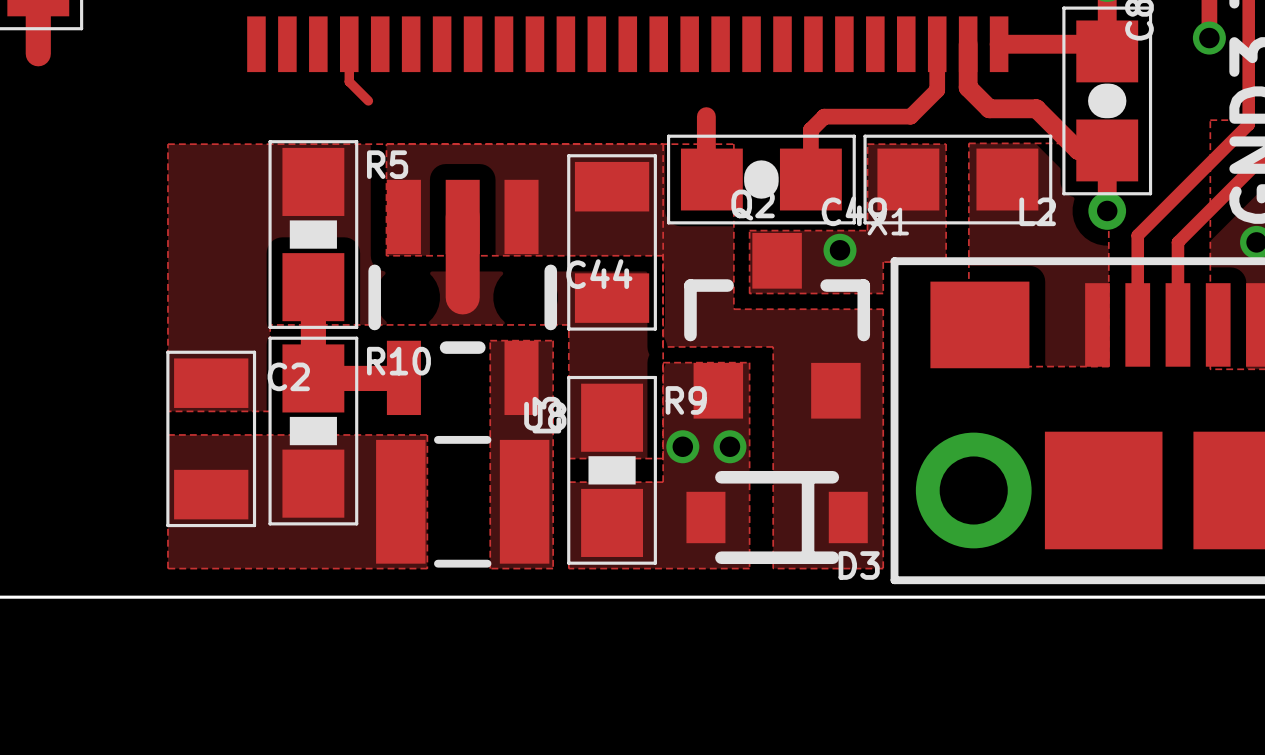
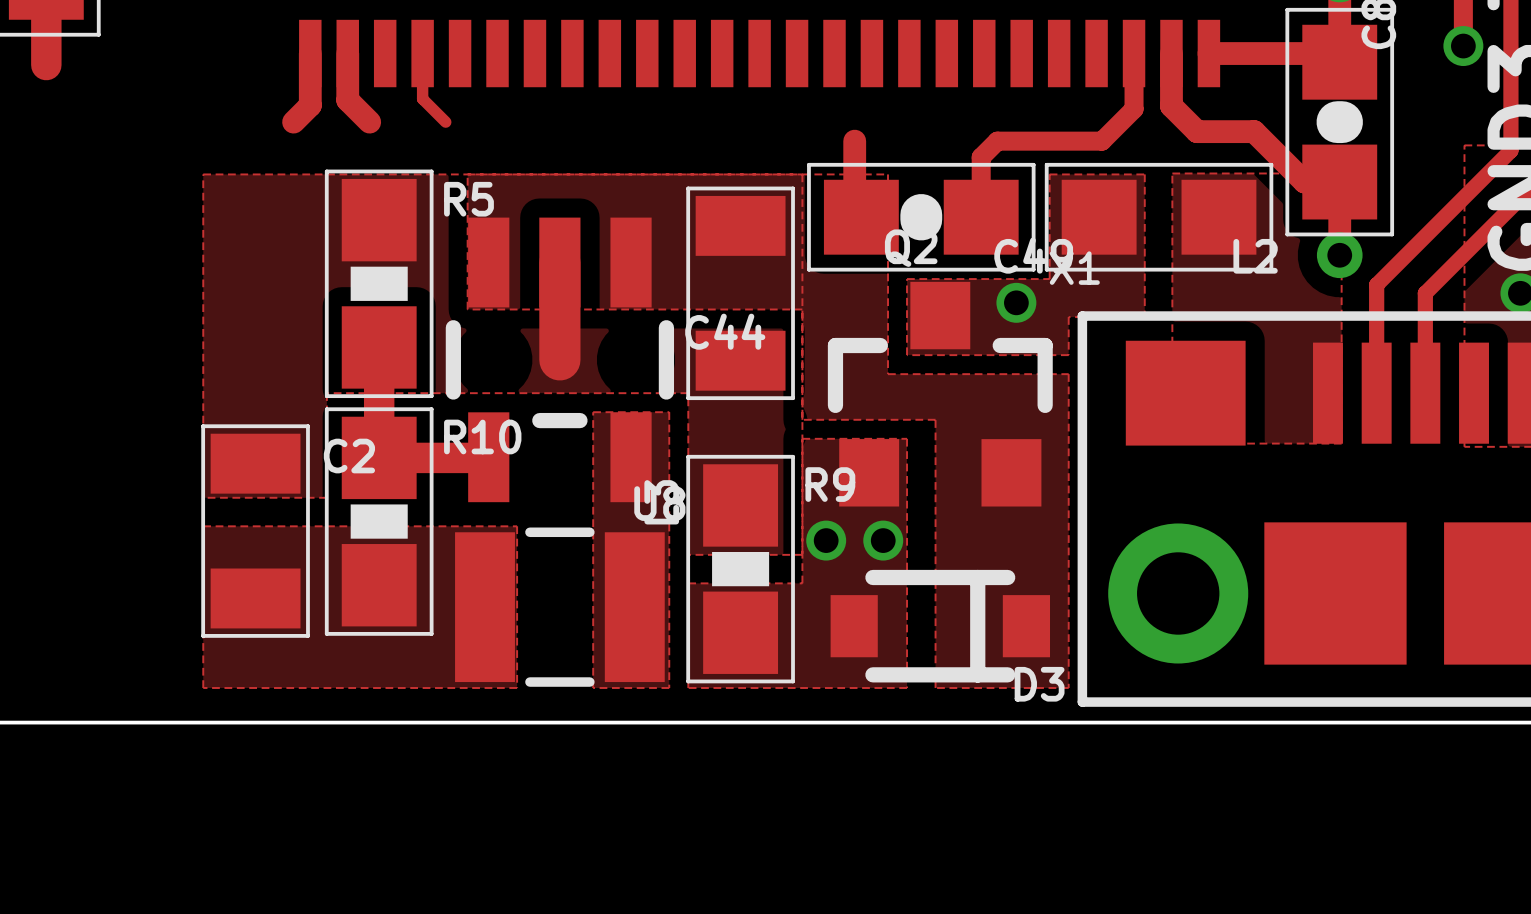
track: none -> (310, 53) (310, 105) (293, 122)
track: none -> (347, 53) (347, 100) (369, 122)

